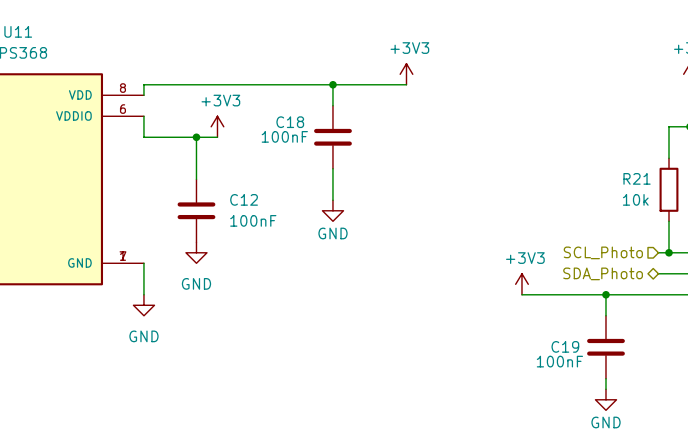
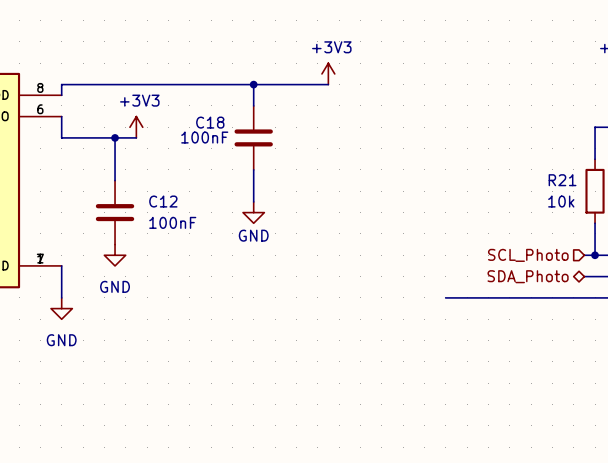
power symbol: +3V3 (521, 284) -> none
wire: (605, 294) (605, 315) -> none
junction: (605, 294) -> none
C19: 100nF (605, 347) -> none
wire: (605, 378) (605, 389) -> none
power symbol: GND (605, 399) -> none

